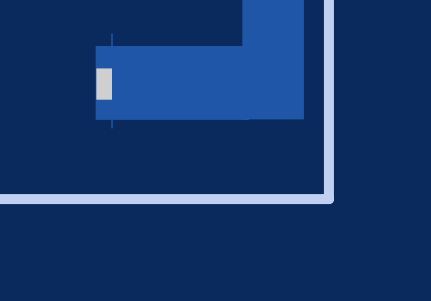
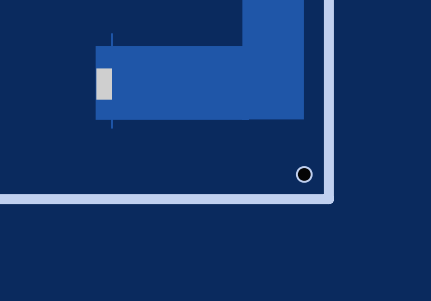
hole: none -> (304, 174)

